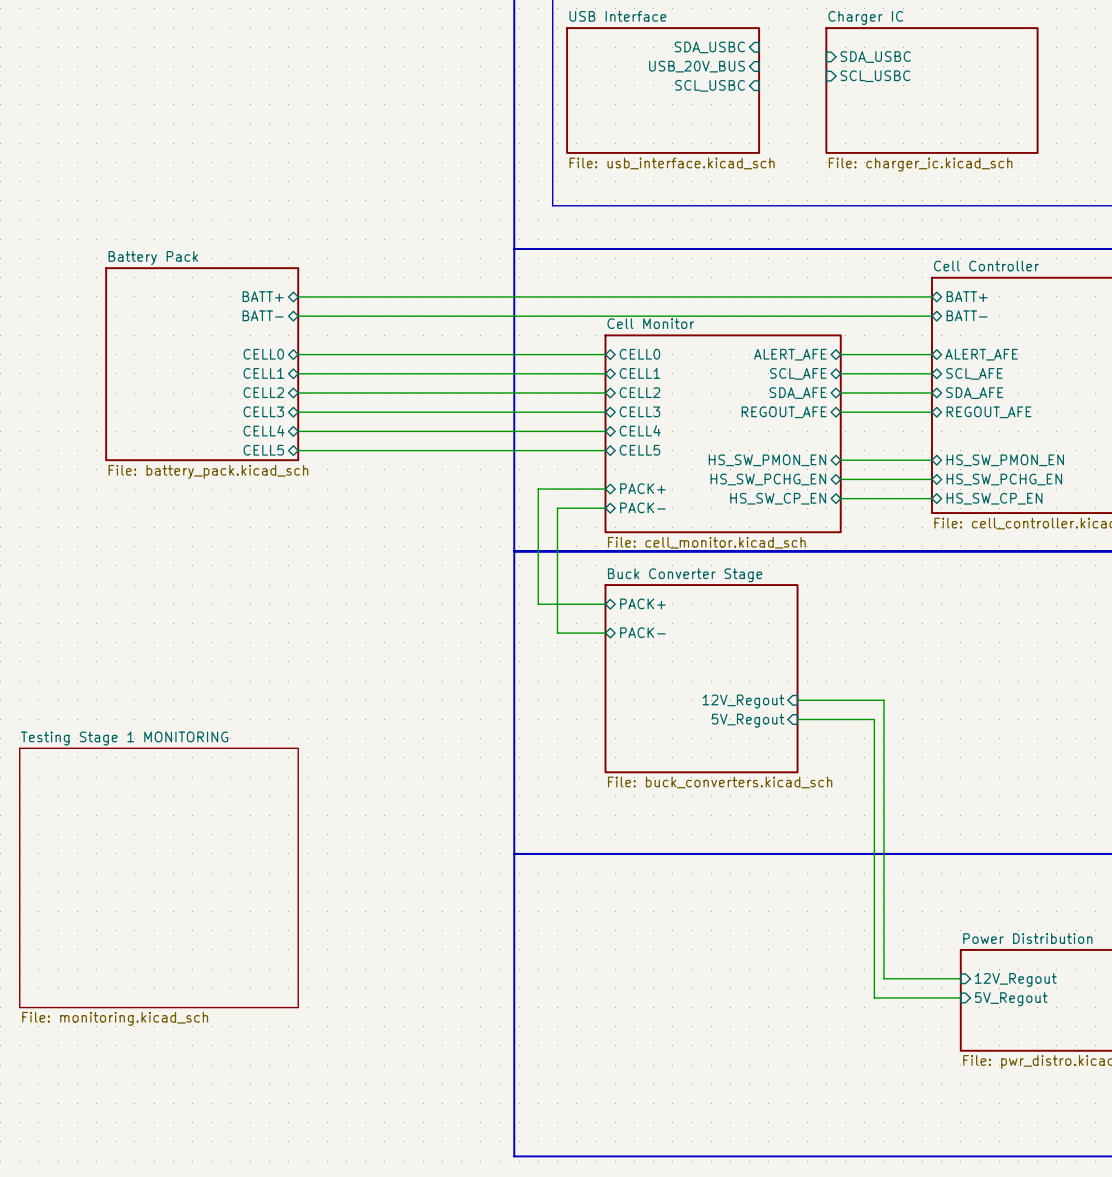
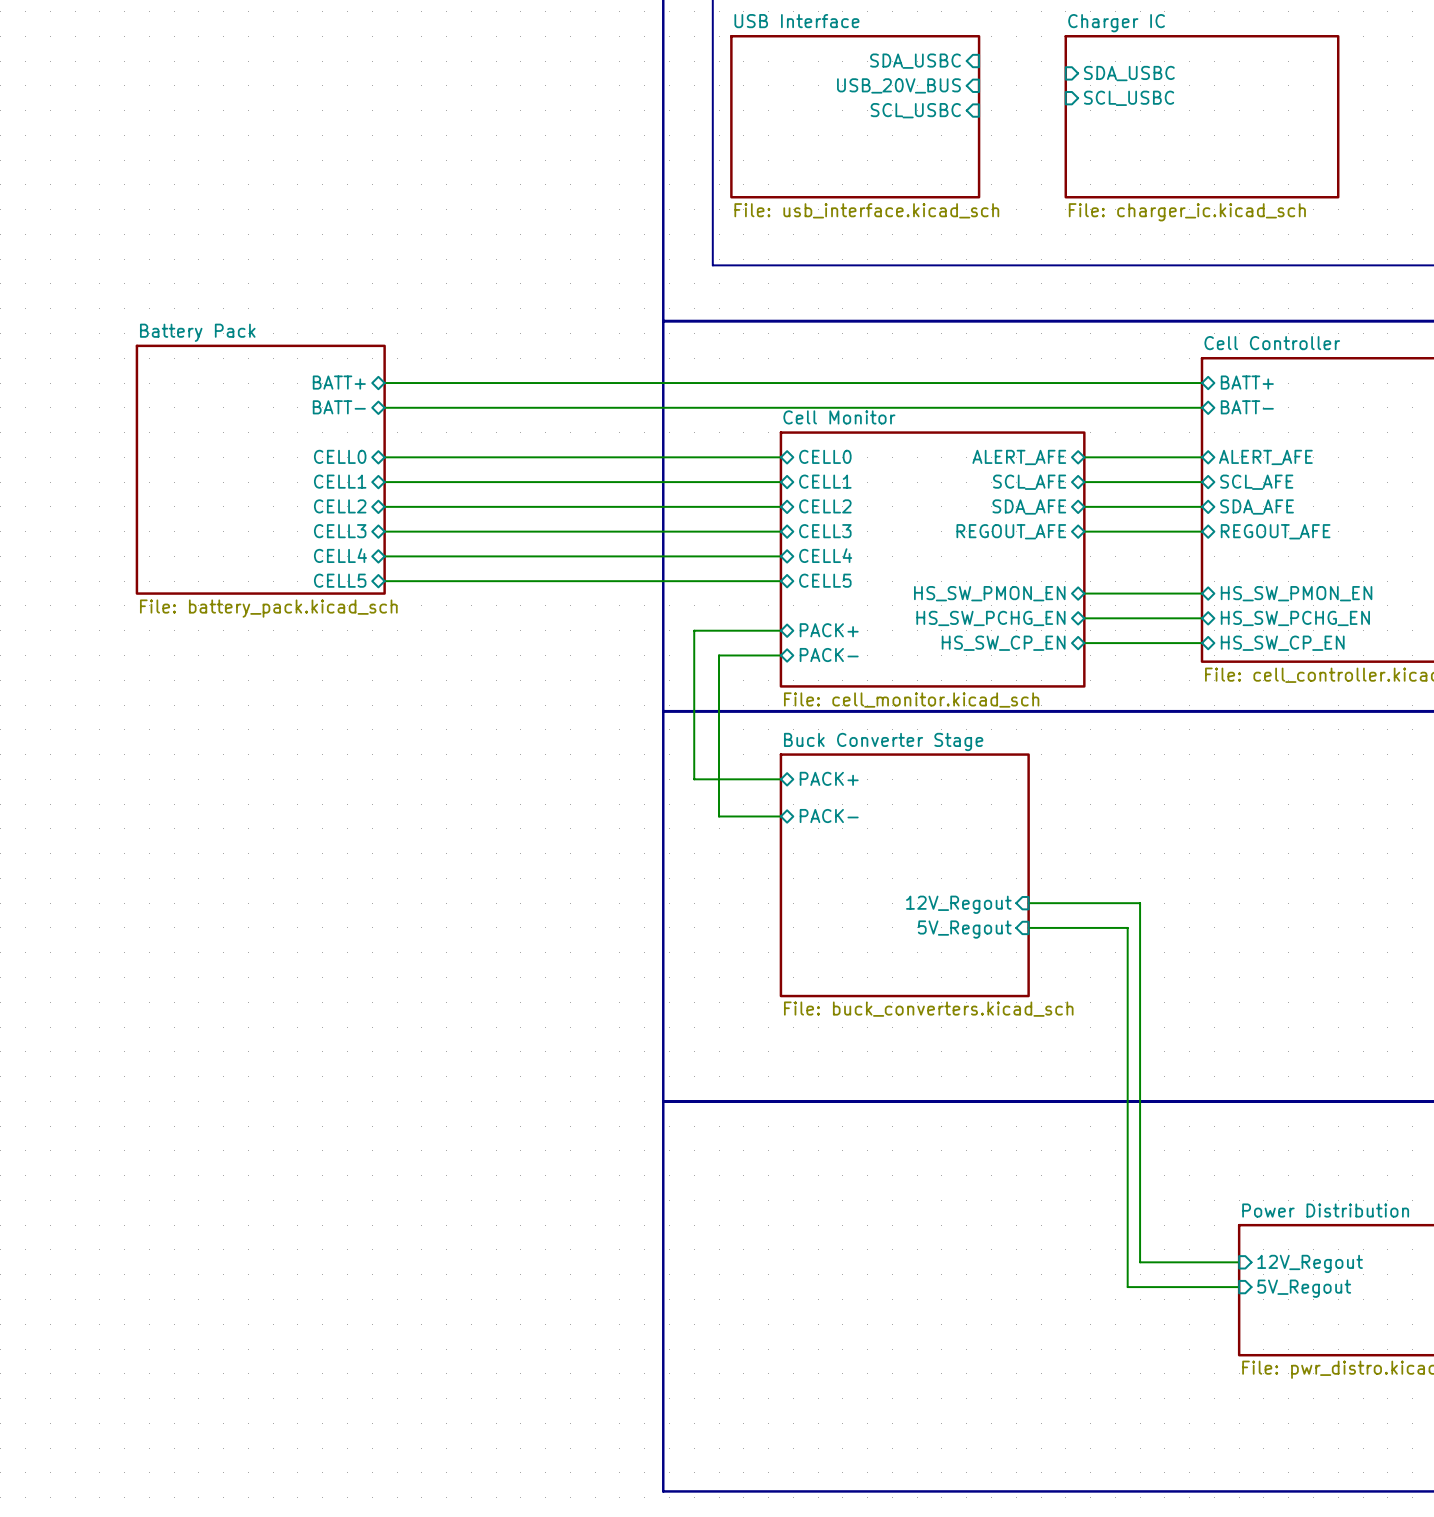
sheet Testing Stage 1 MONITORING: File: monitoring.kicad_sch (158, 877) -> none

